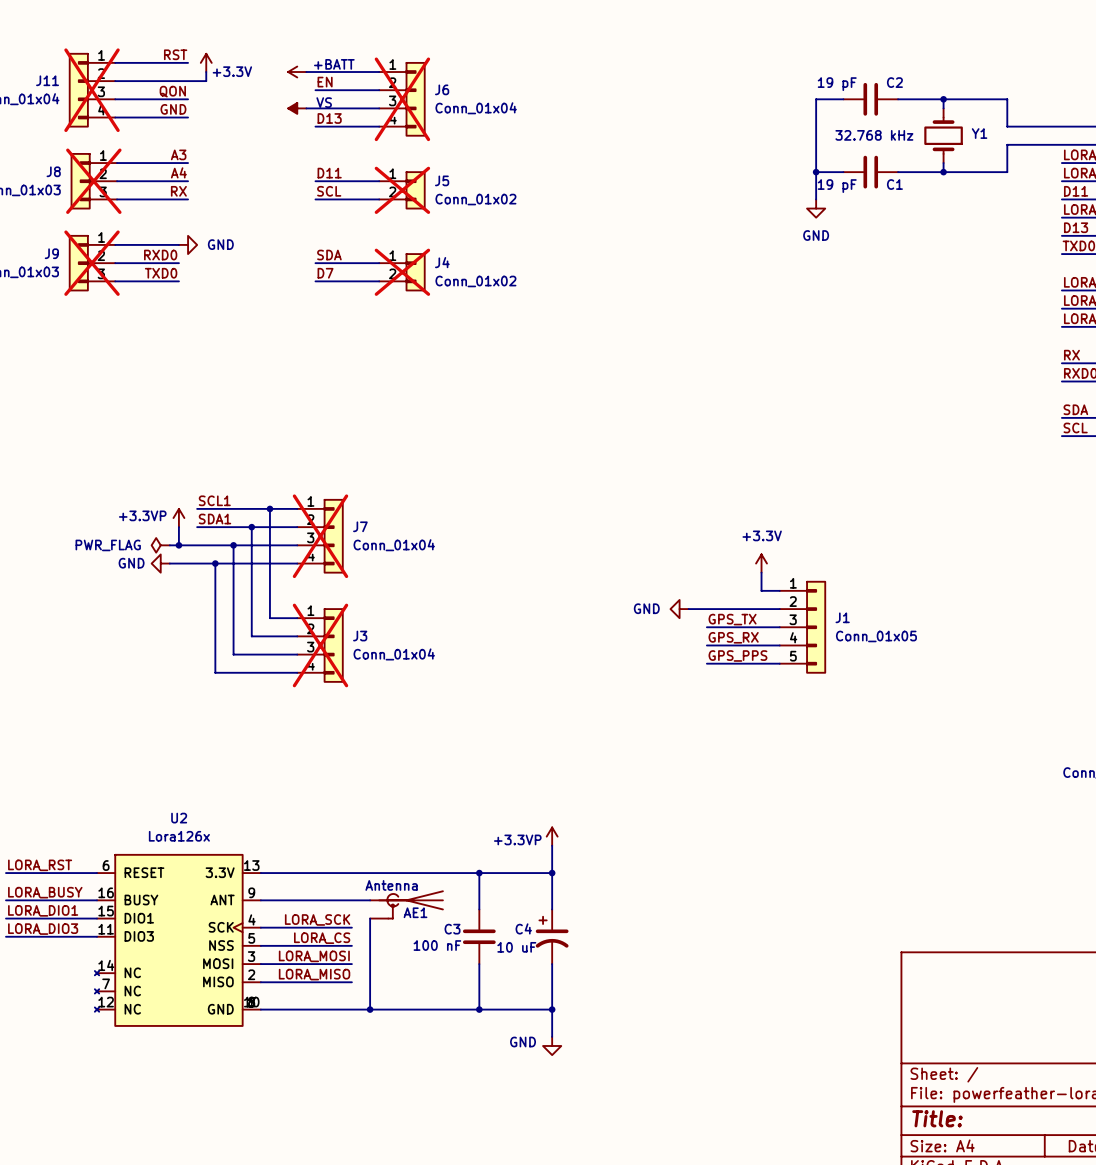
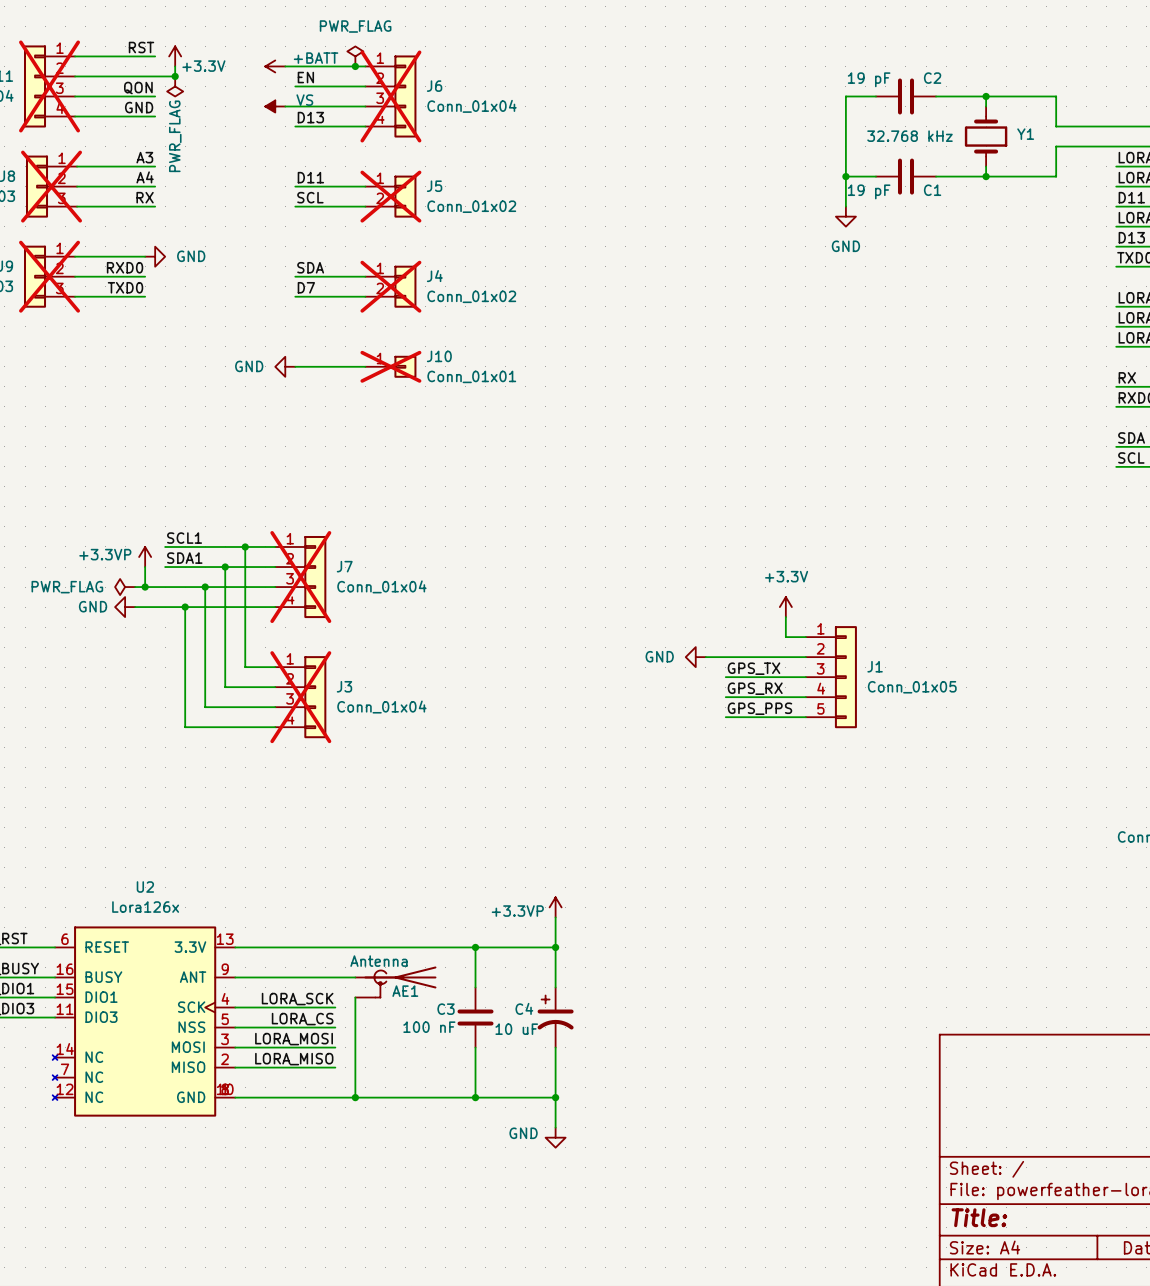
power symbol: none -> PWR_FLAG (355, 56)
junction: none -> (355, 66)
junction: none -> (175, 76)
power symbol: none -> PWR_FLAG (175, 86)
power symbol: none -> GND (285, 366)
wire: none -> (295, 366) (365, 366)
J10: none -> Conn_01x01 (390, 366)

